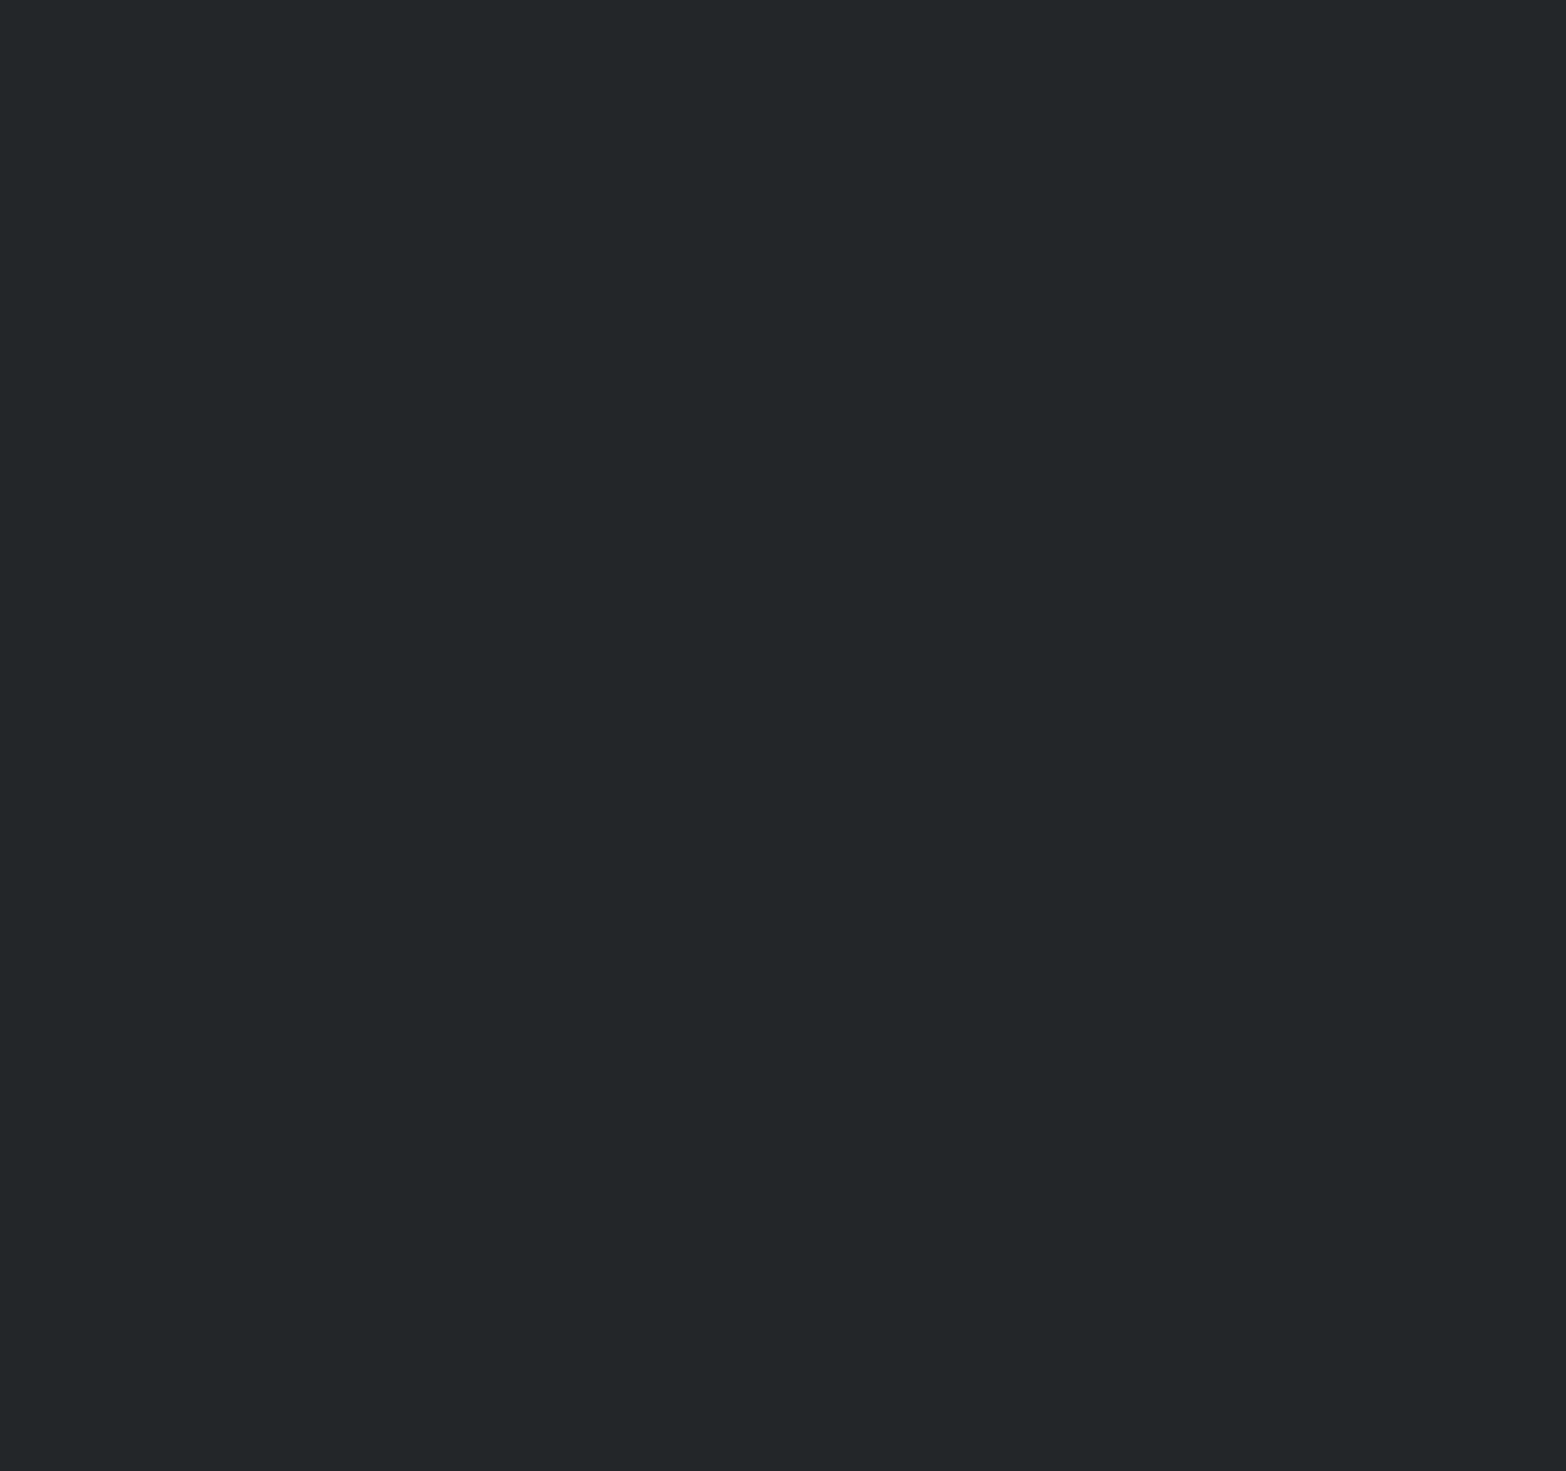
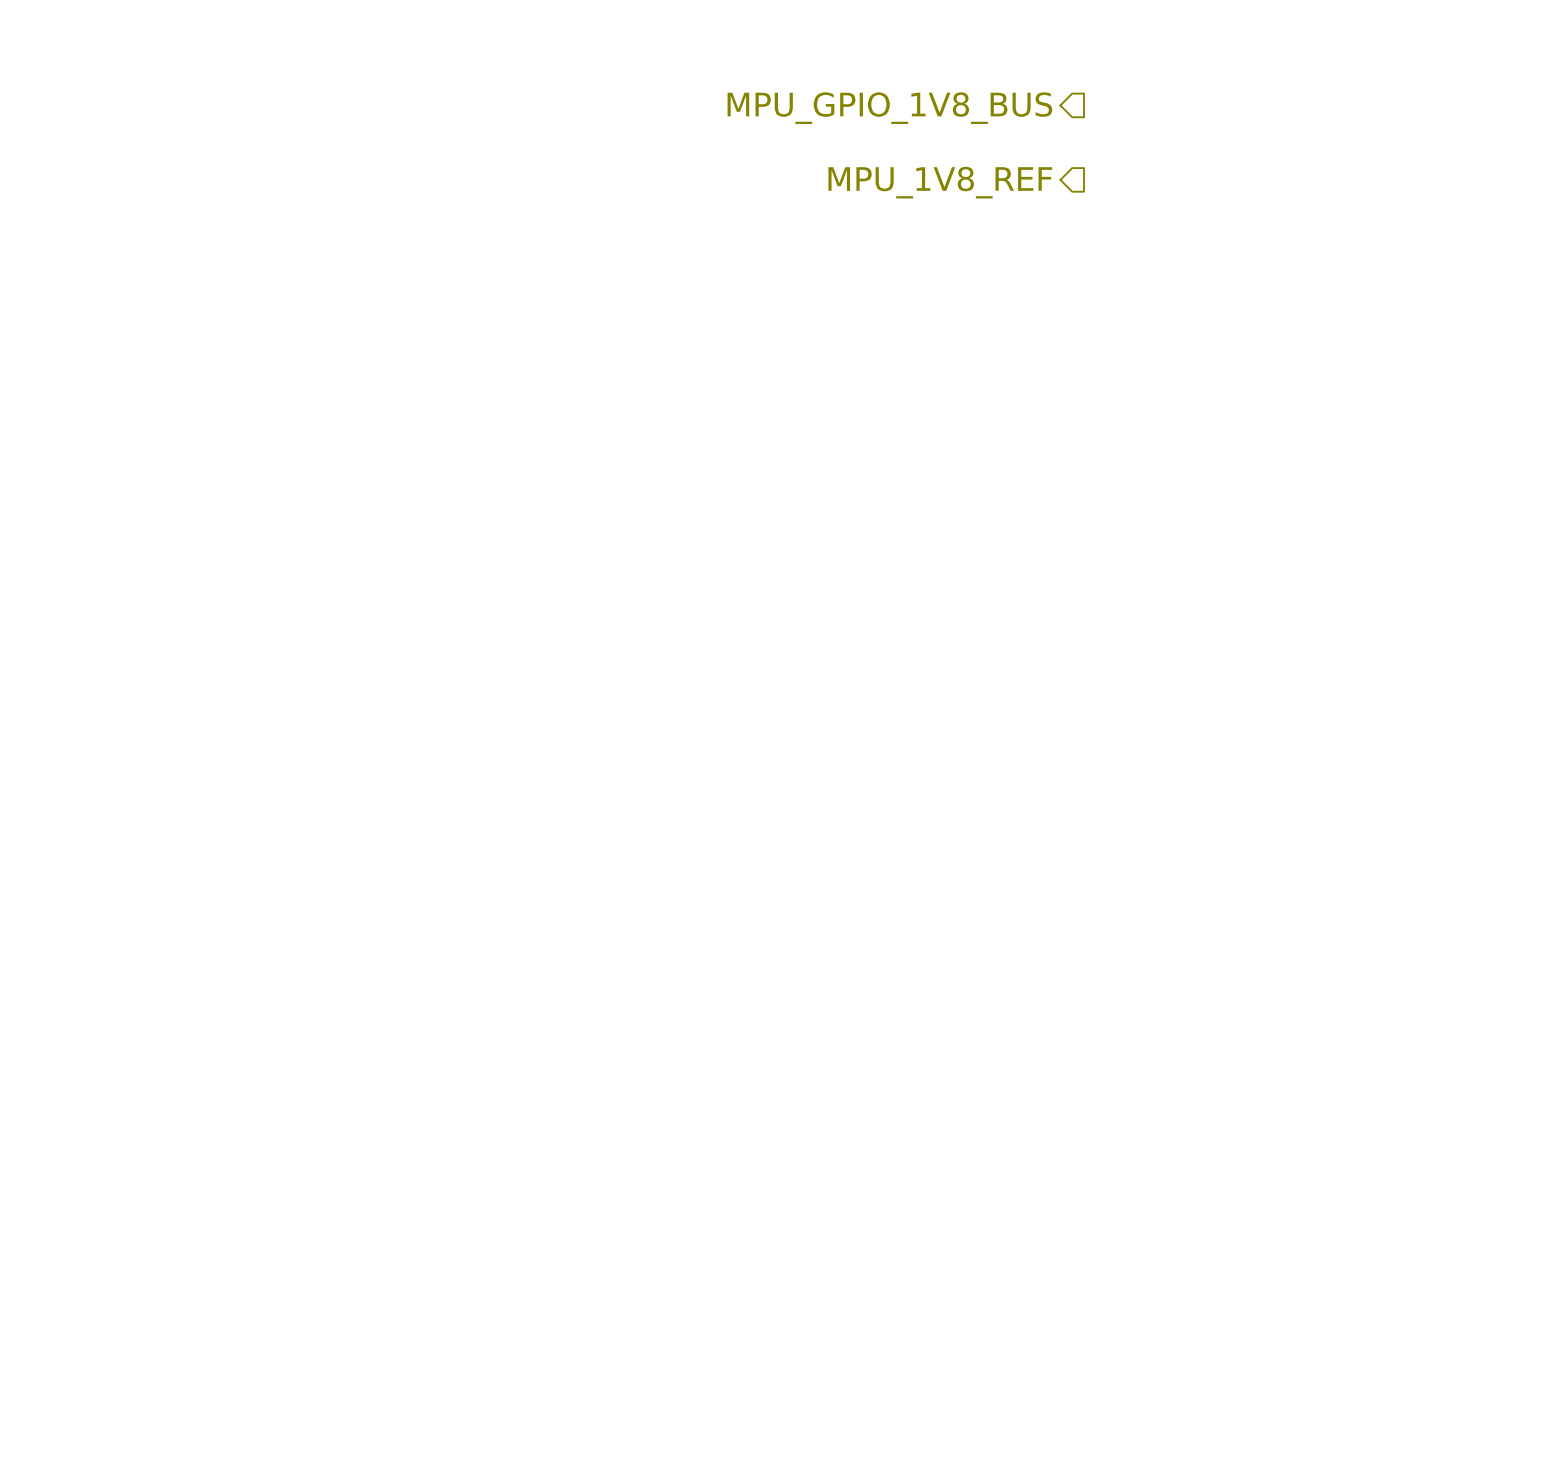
hierarchical label: none -> MPU_GPIO_1V8_BUS (889, 108)
hierarchical label: none -> MPU_1V8_REF (940, 182)

